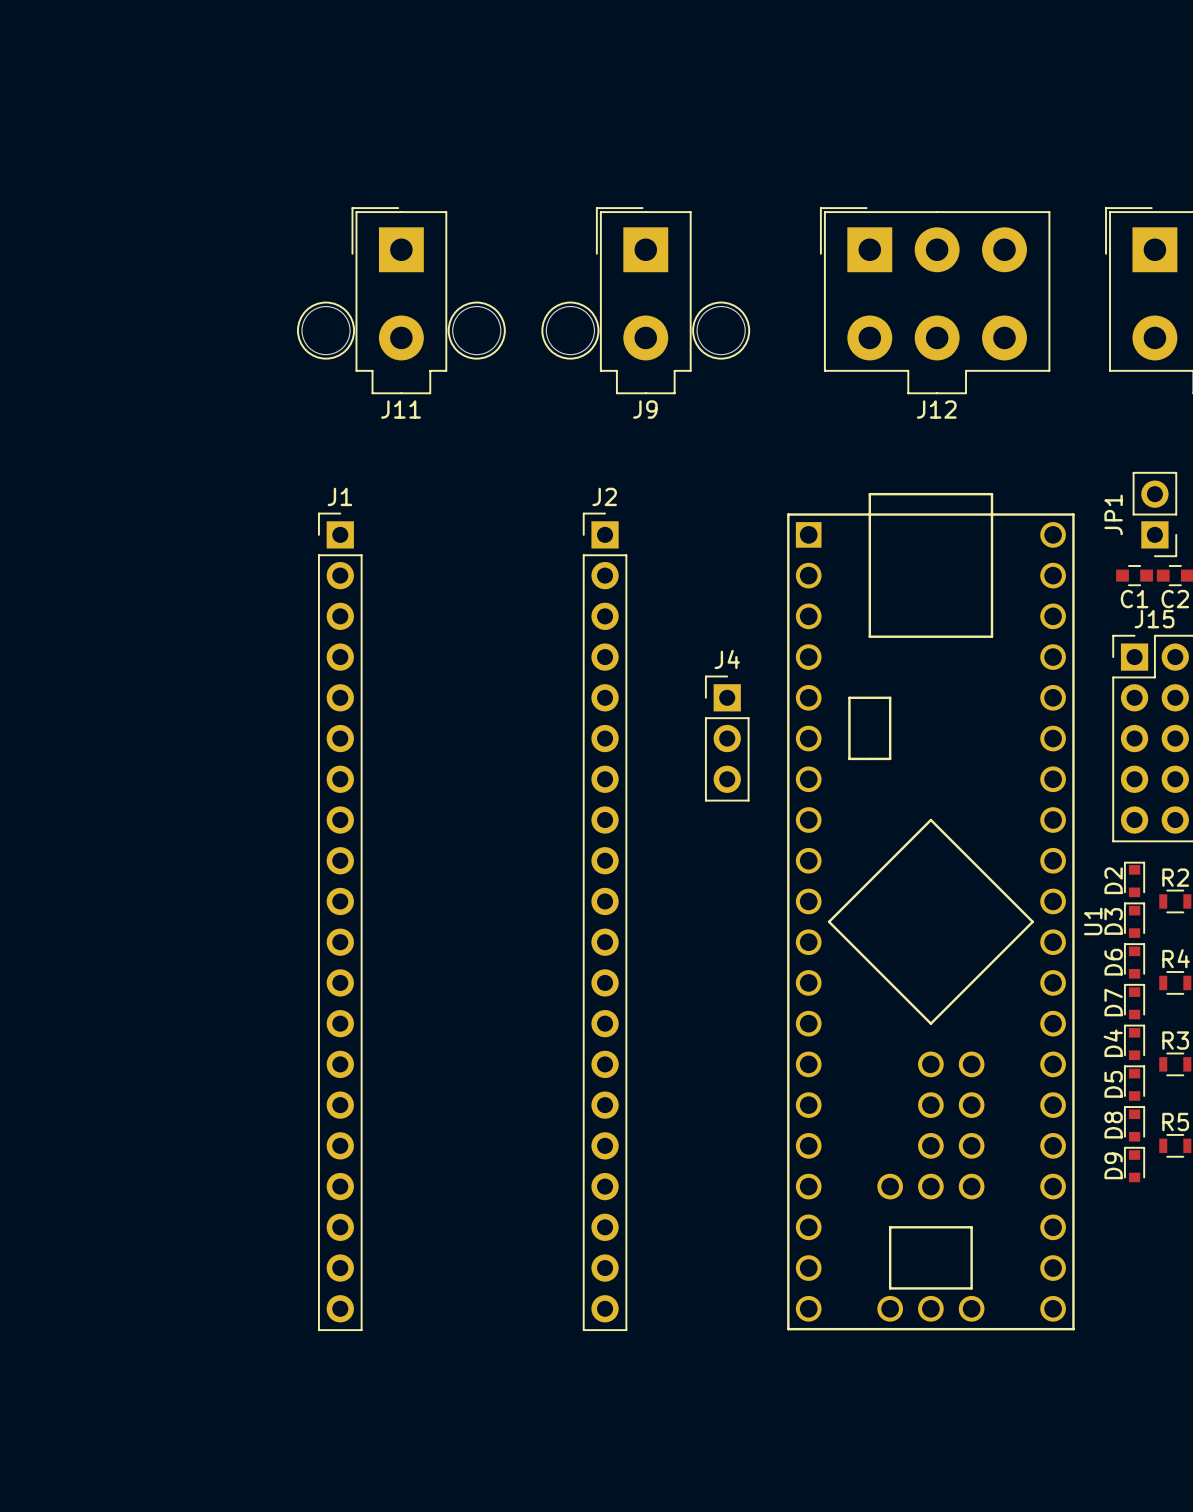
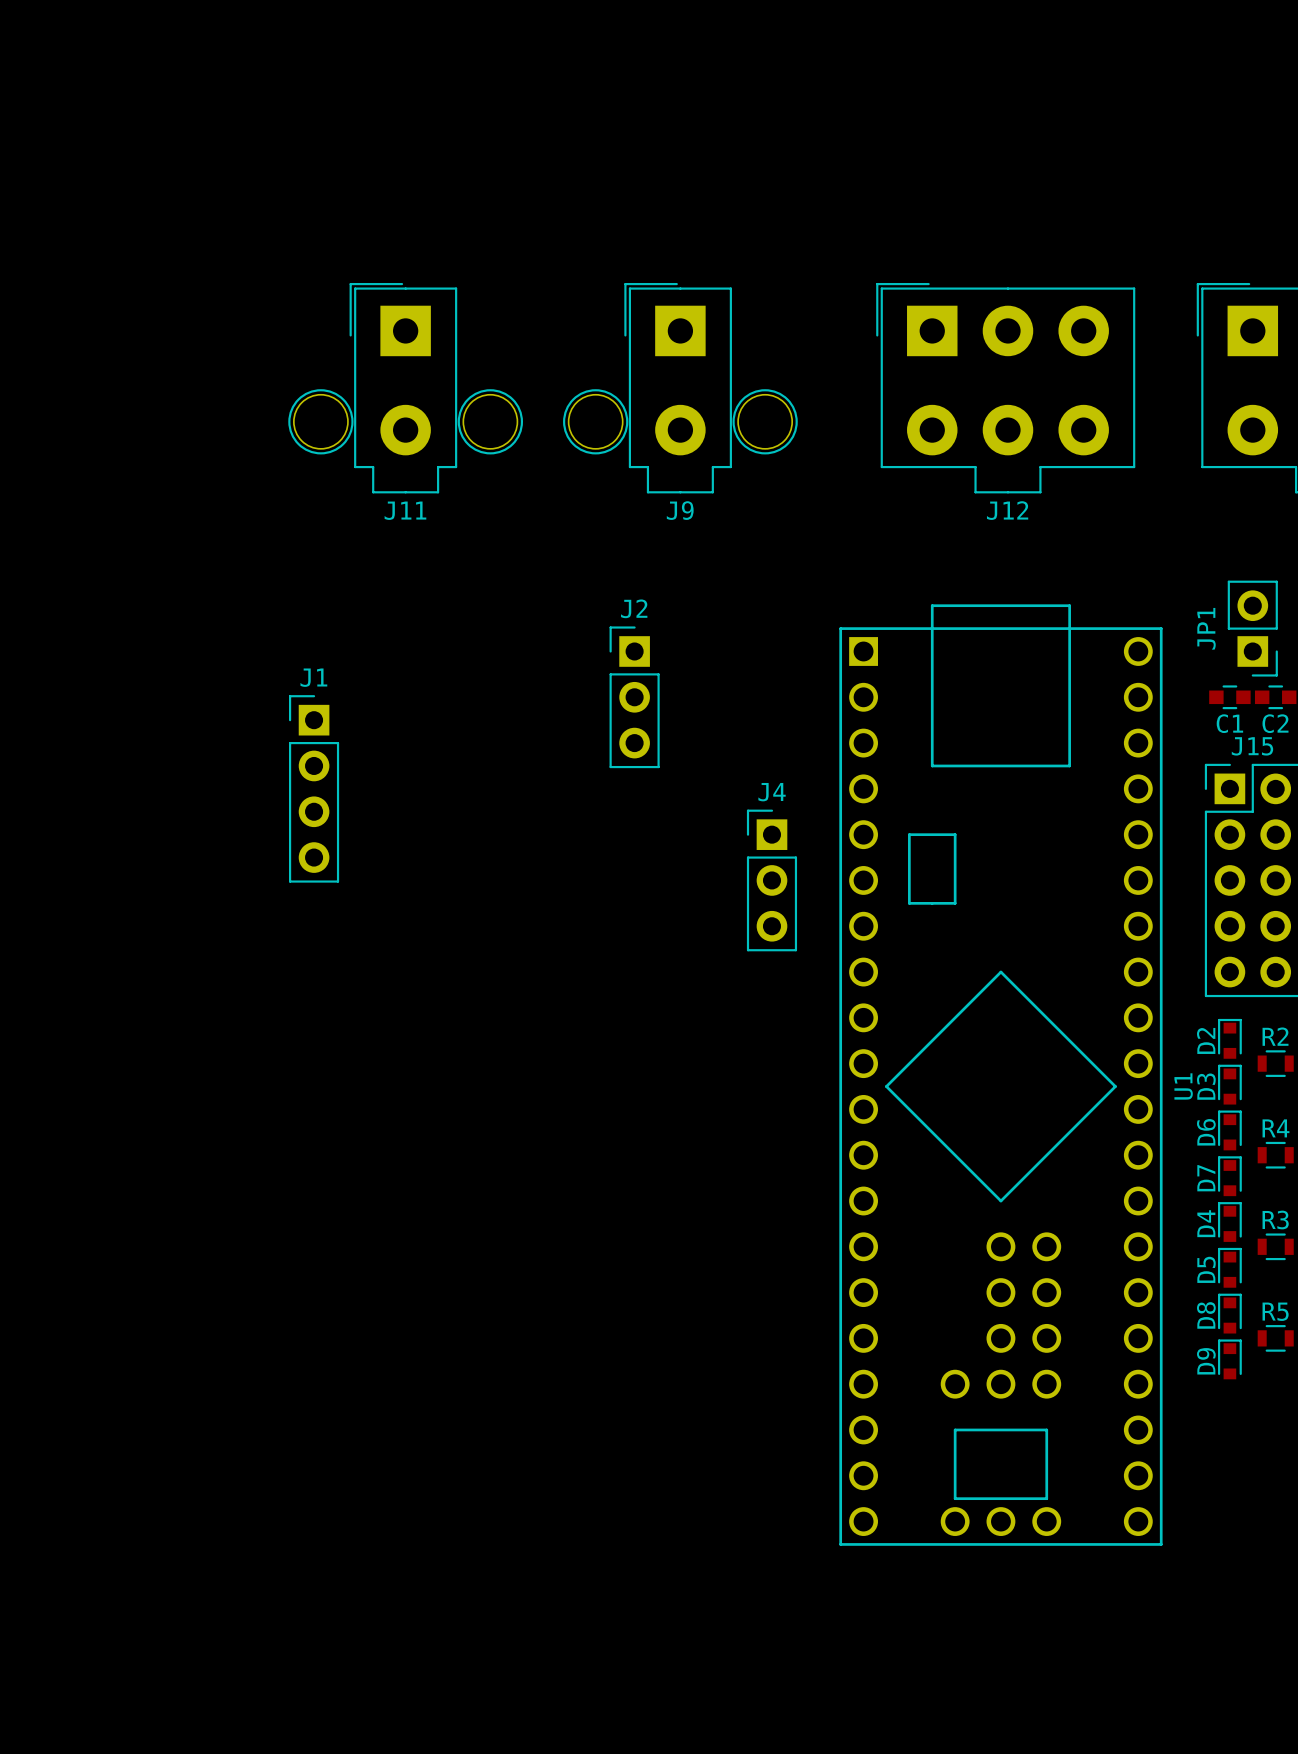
J1 name position: J1 (339, 496) -> J1 (313, 677)
J1 footprint: [318, 512, 363, 1332] -> [288, 695, 340, 883]
J2 footprint: [582, 512, 628, 1332] -> [609, 626, 660, 769]

